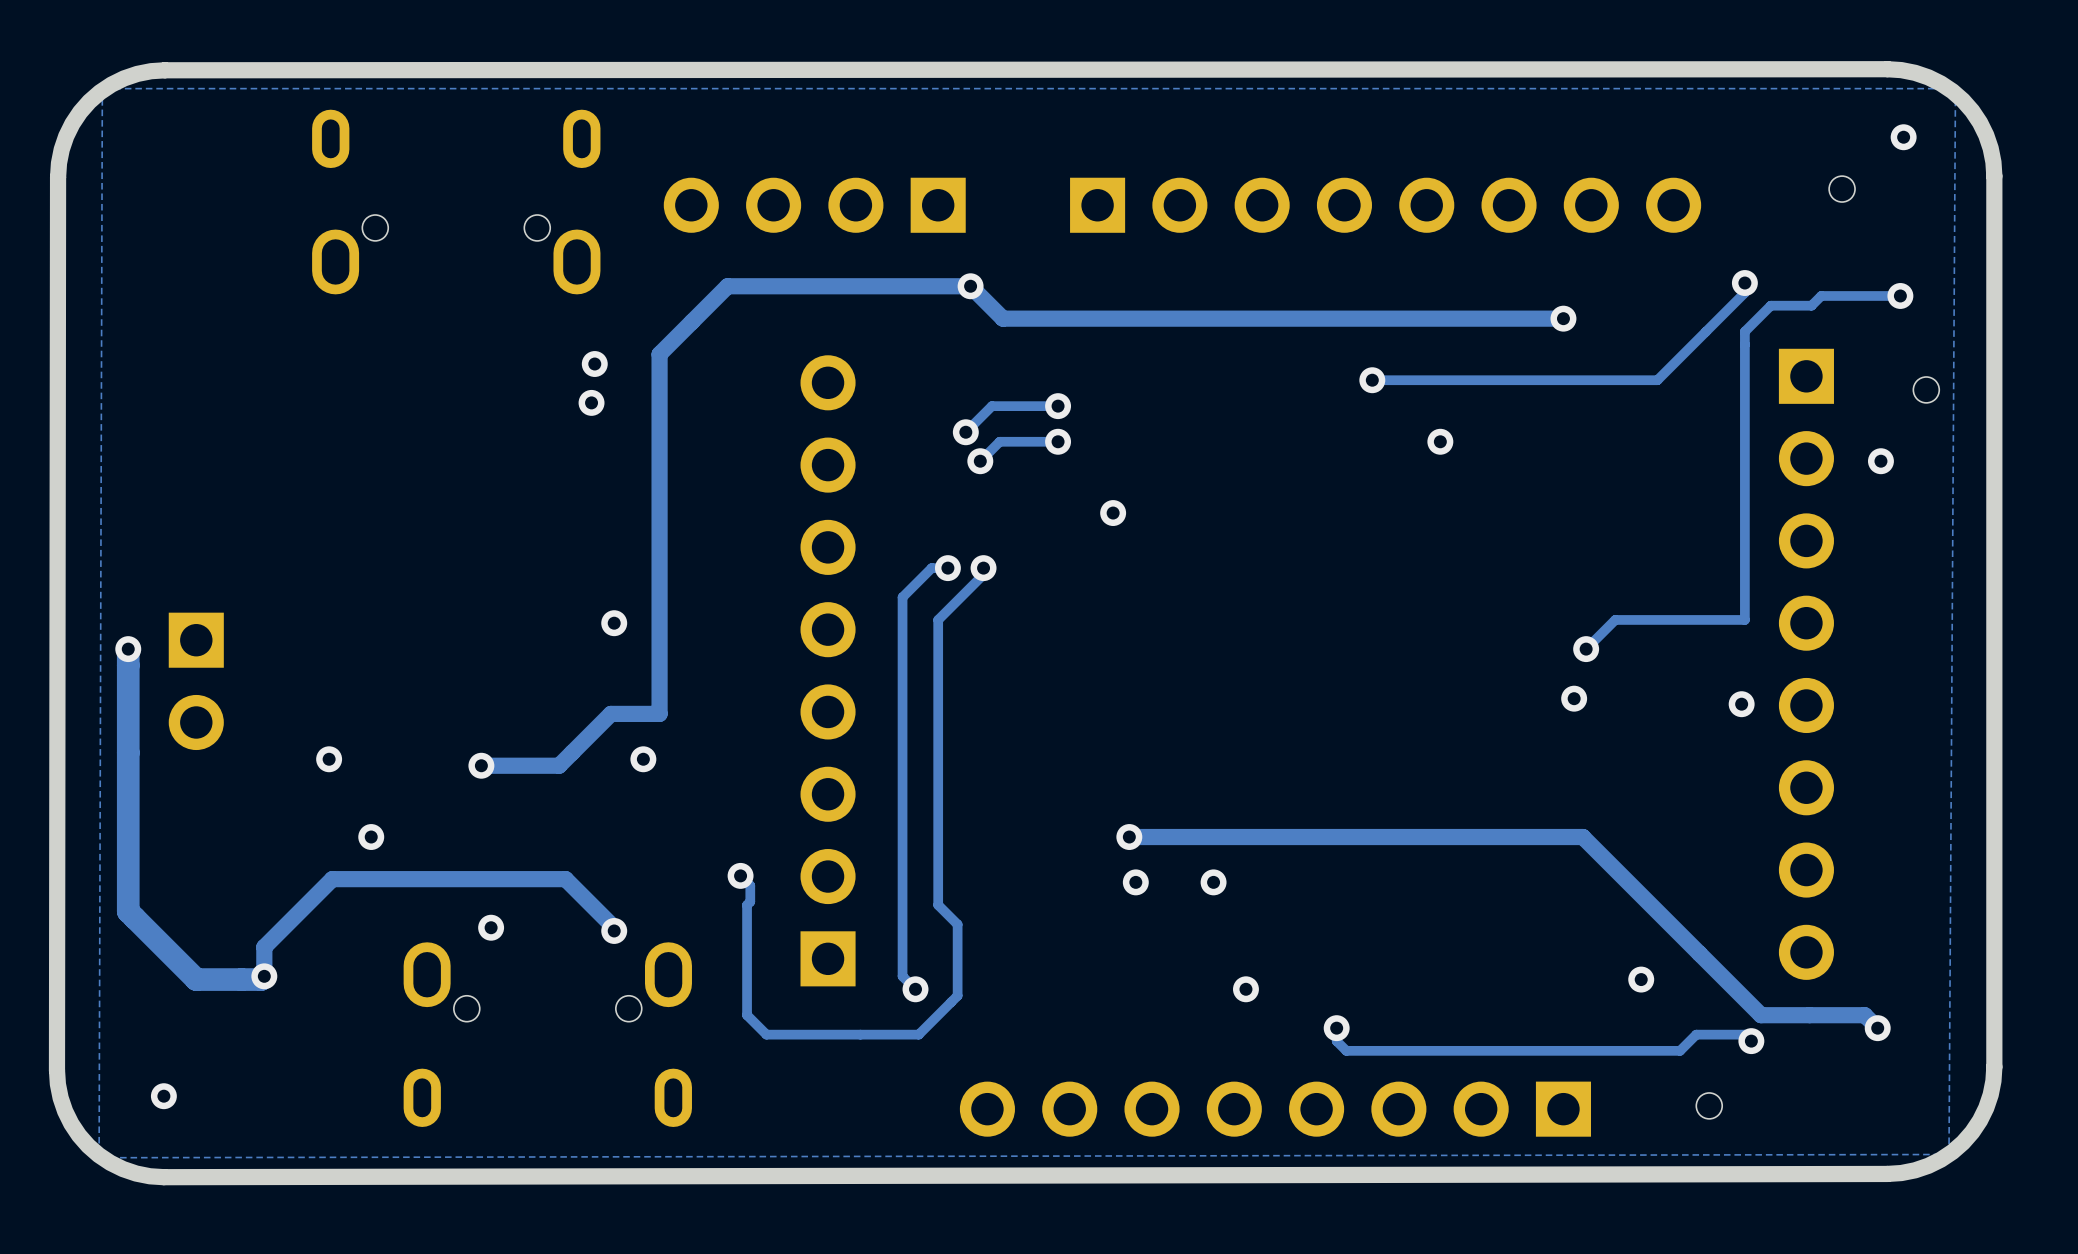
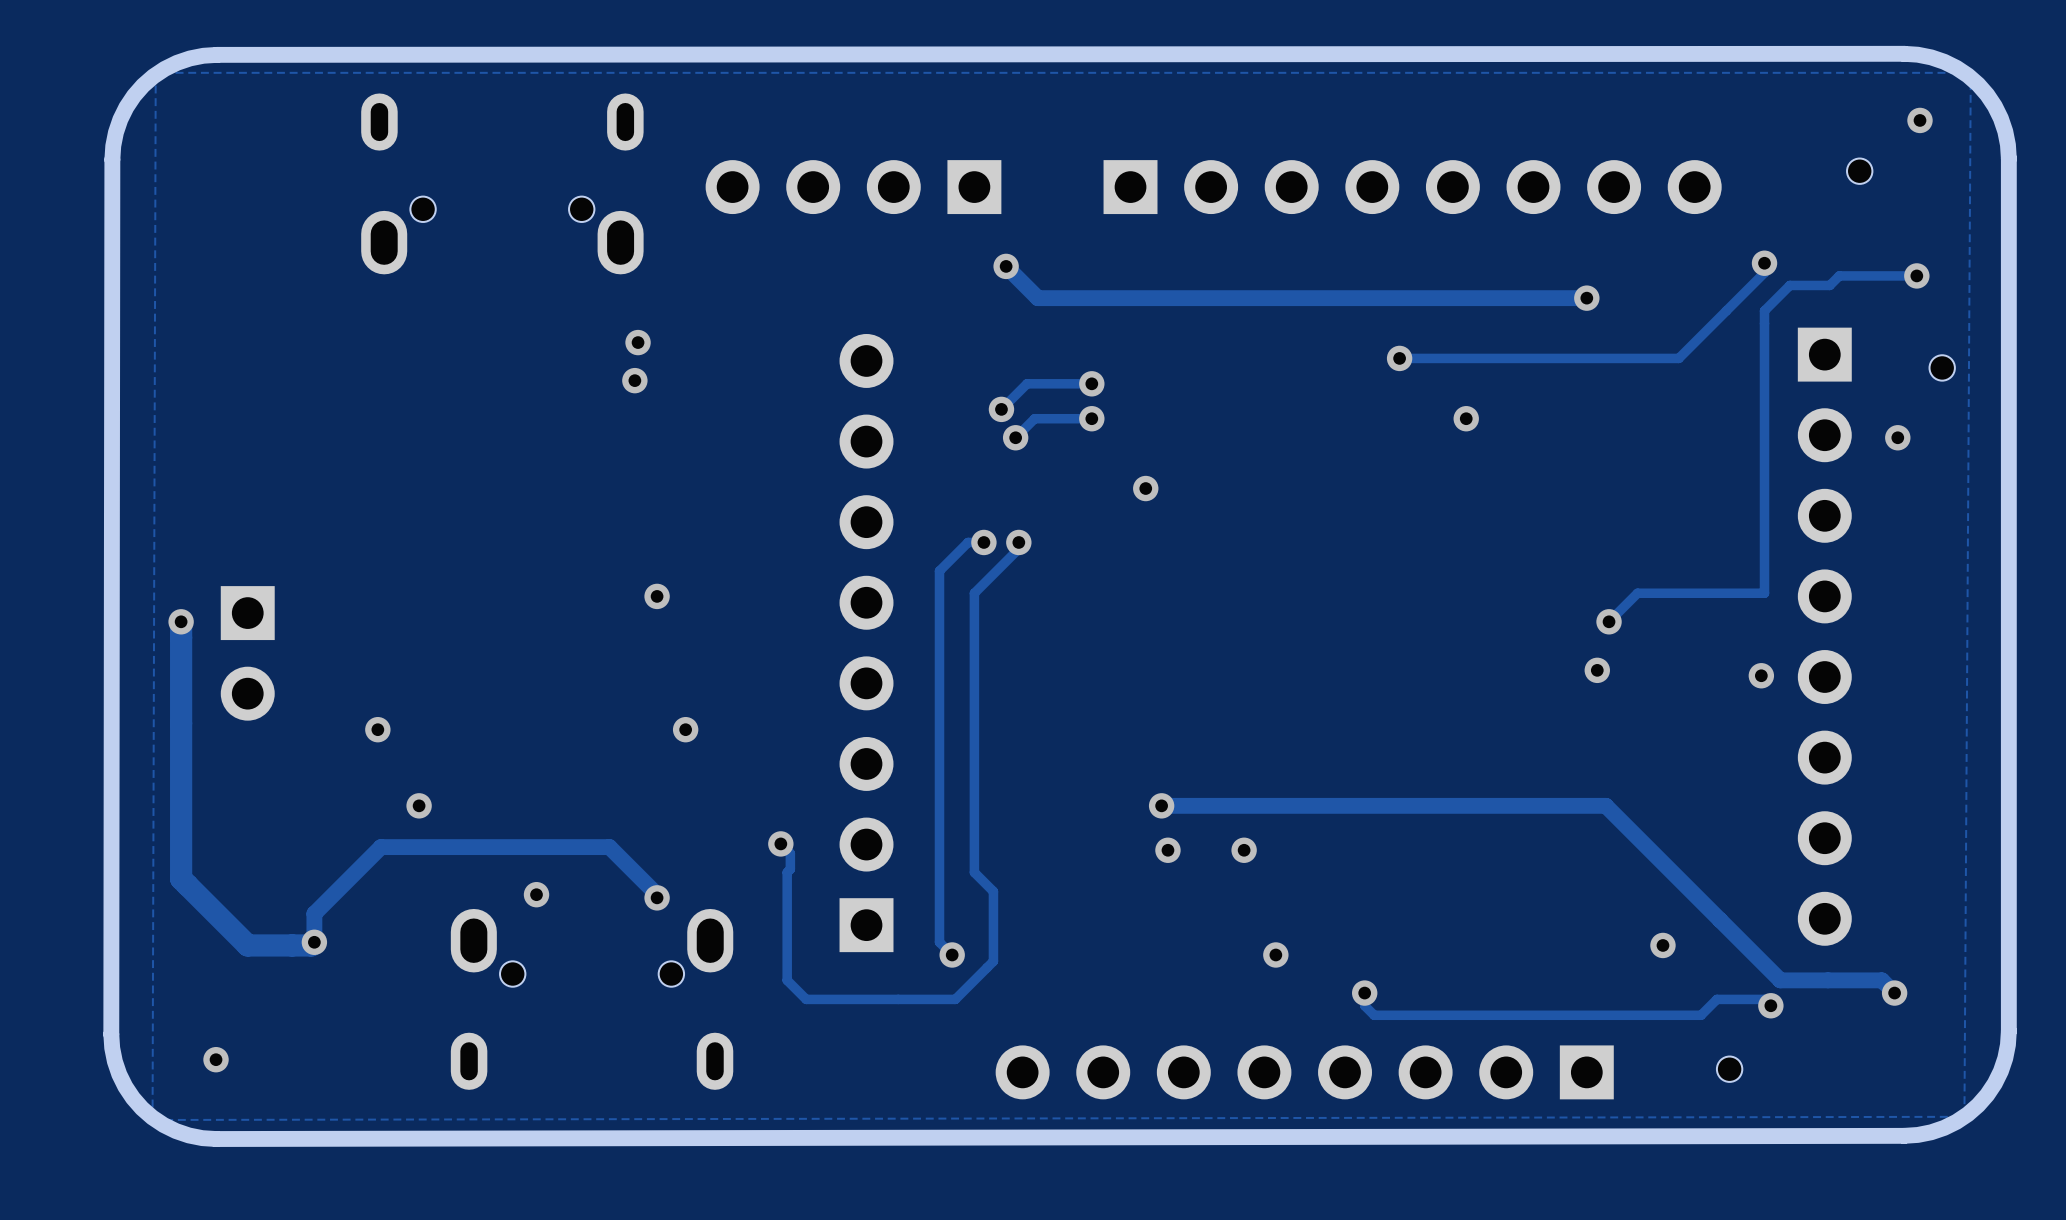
track: (970, 286) (727, 286) (659, 354) (659, 713) (610, 713) (559, 765) (481, 765) -> none
via: (481, 765) -> none

